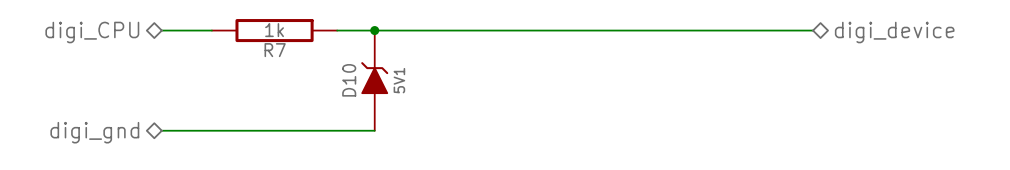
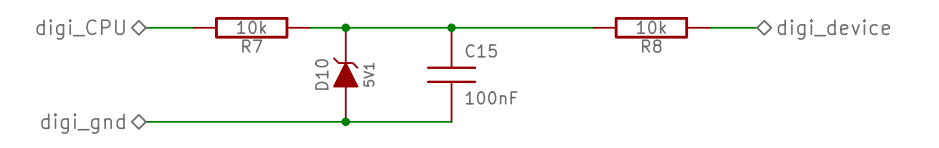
R7 value: 1k (274, 30) -> 10k (251, 27)
junction: none -> (451, 27)
wire: (637, 30) (762, 30) -> none
R8: none -> 10k (651, 27)
C15: none -> 100nF (451, 74)
wire: none -> (345, 121) (451, 121)
junction: none -> (345, 121)

